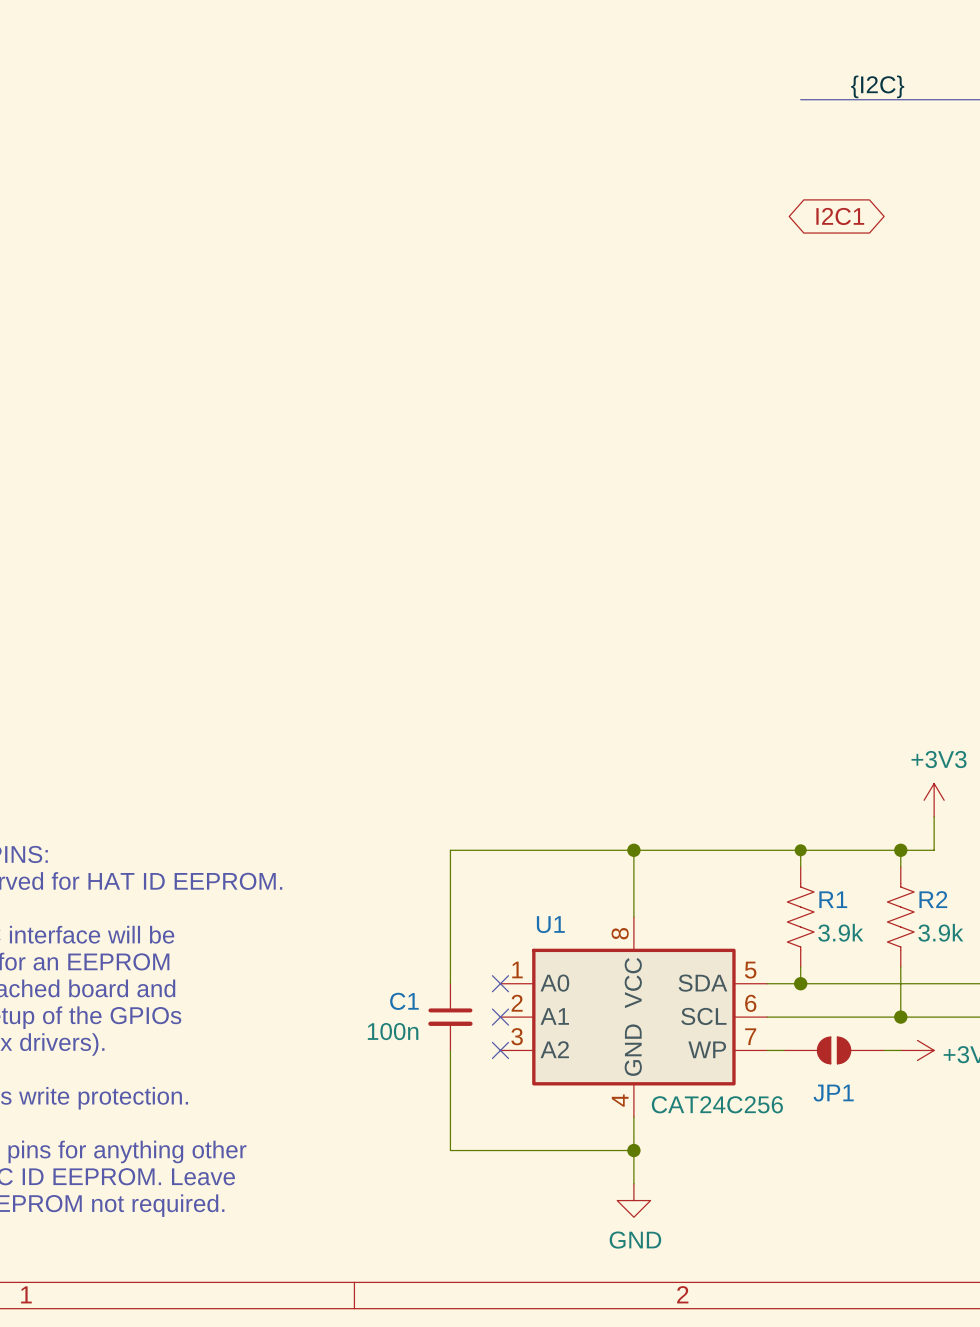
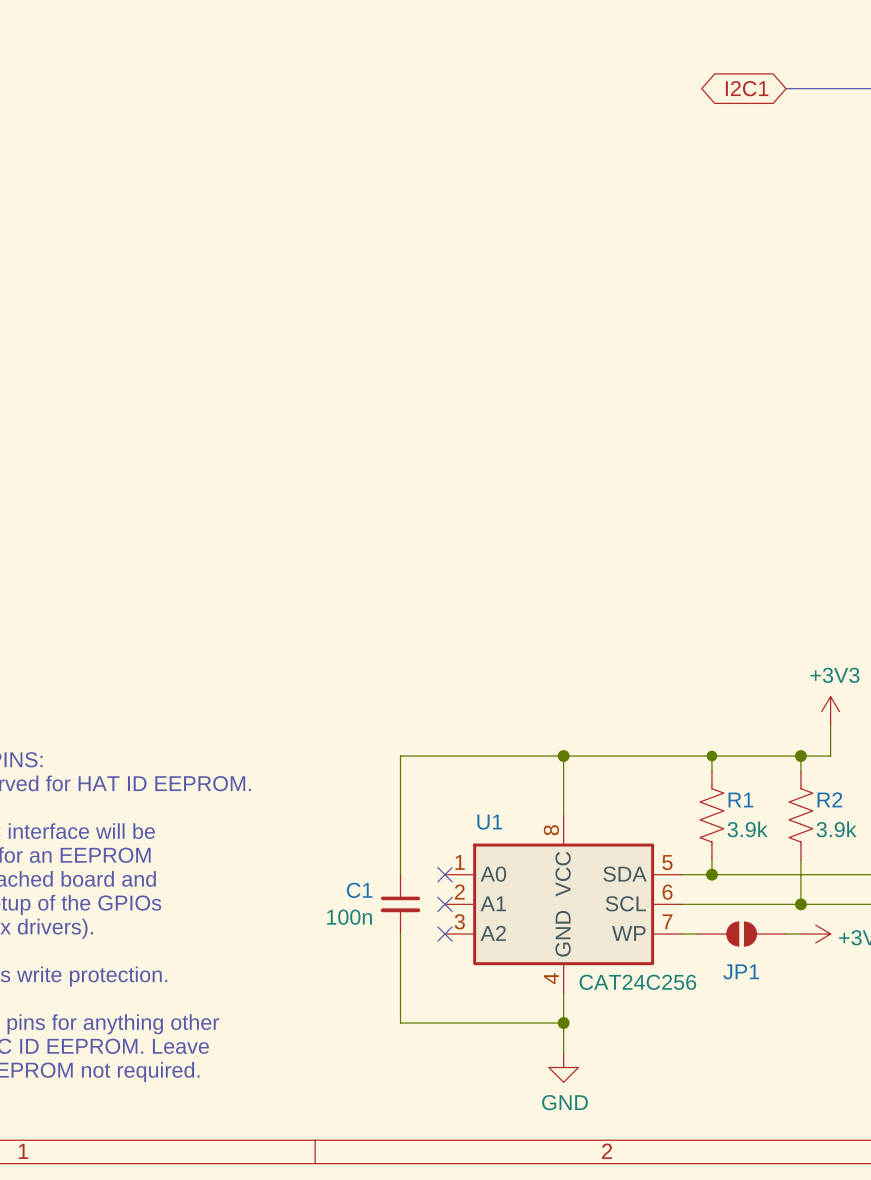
label: {I2C} (877, 86) -> none
bus: (800, 99) (884, 99) -> none
global label position: I2C1 (840, 216) -> I2C1 (747, 88)

